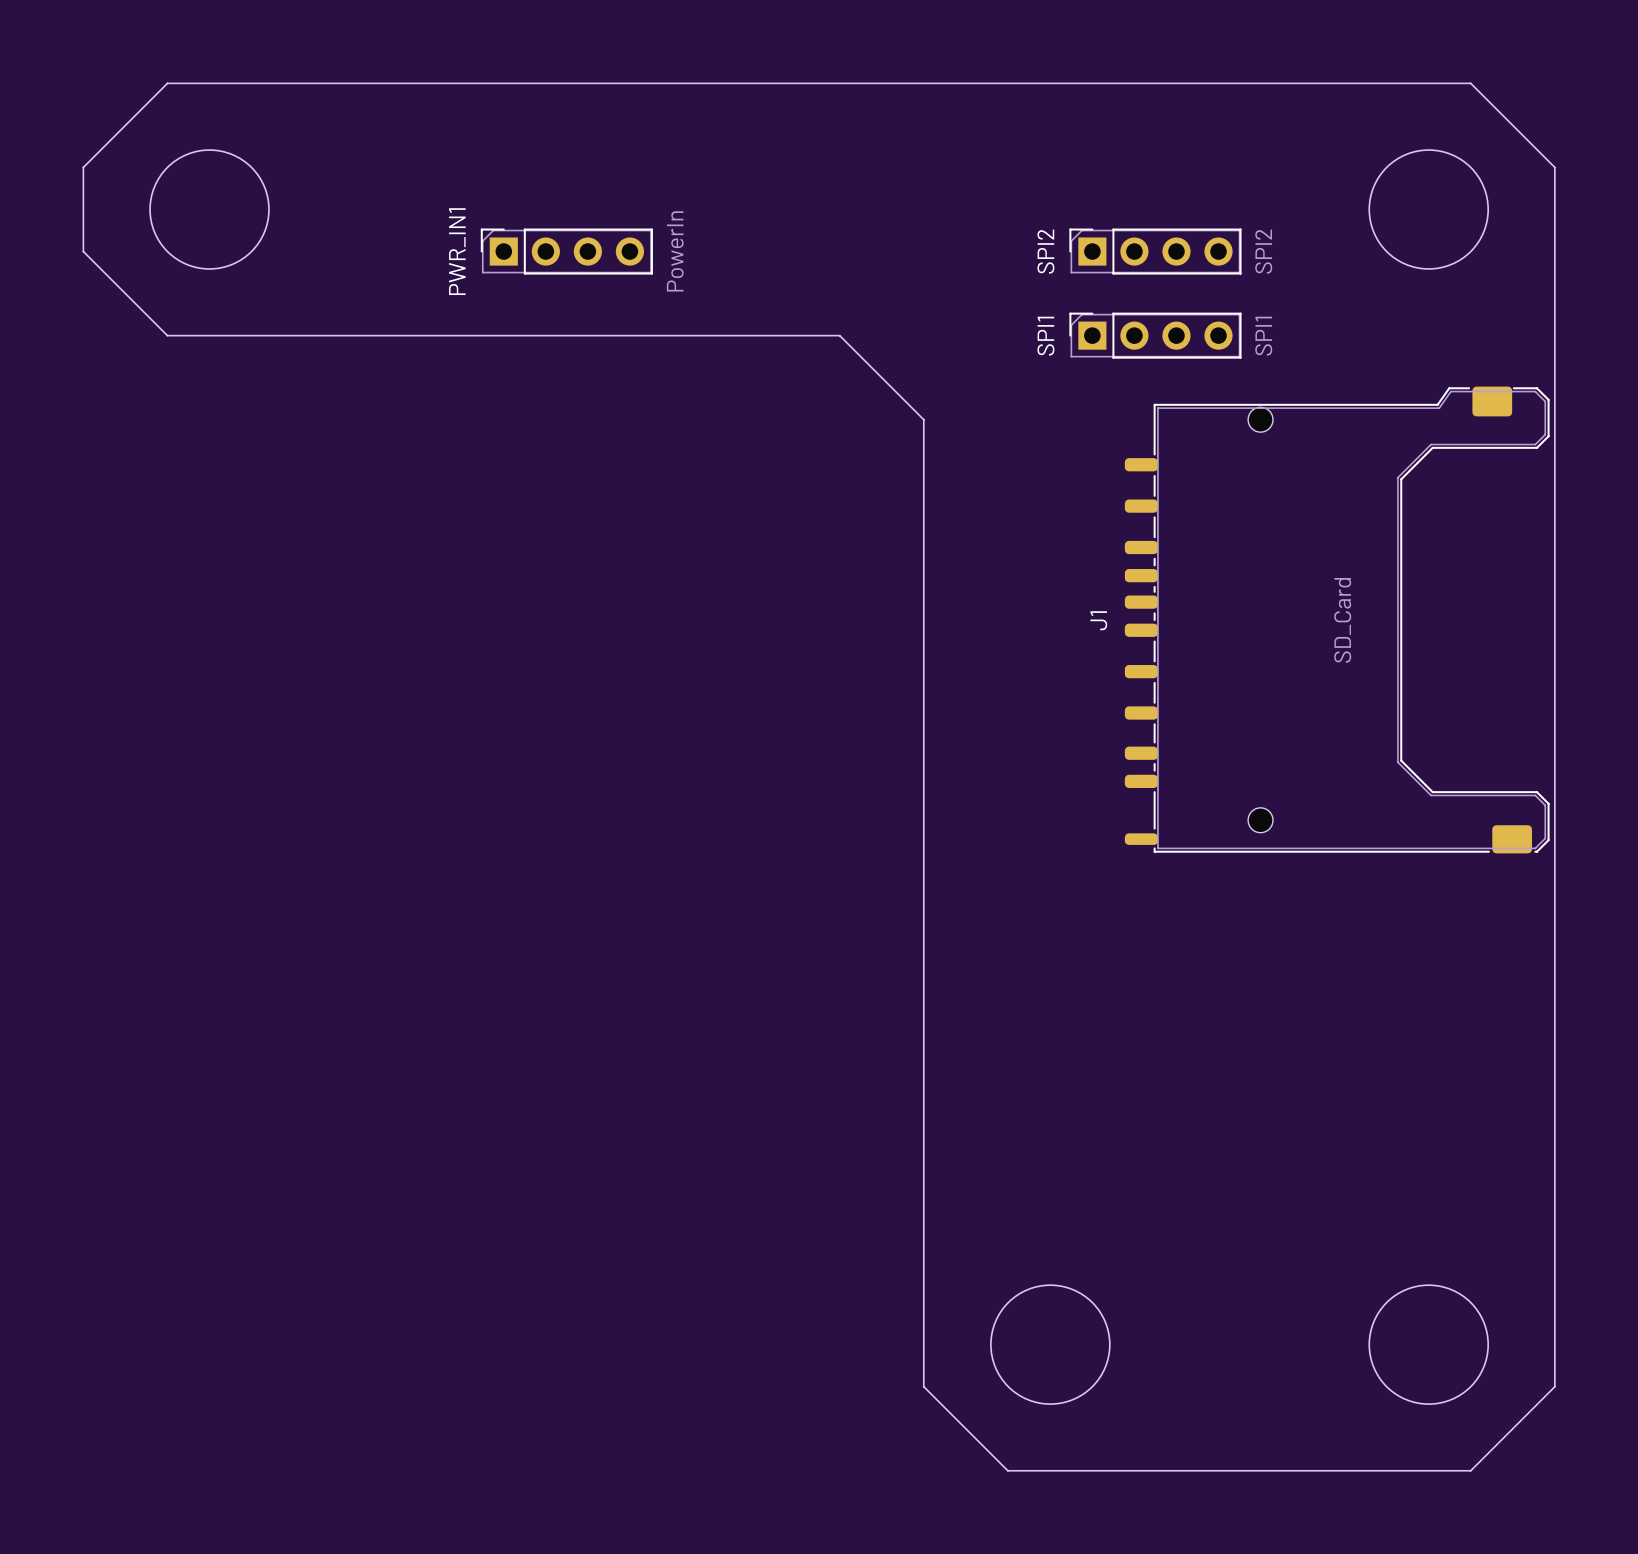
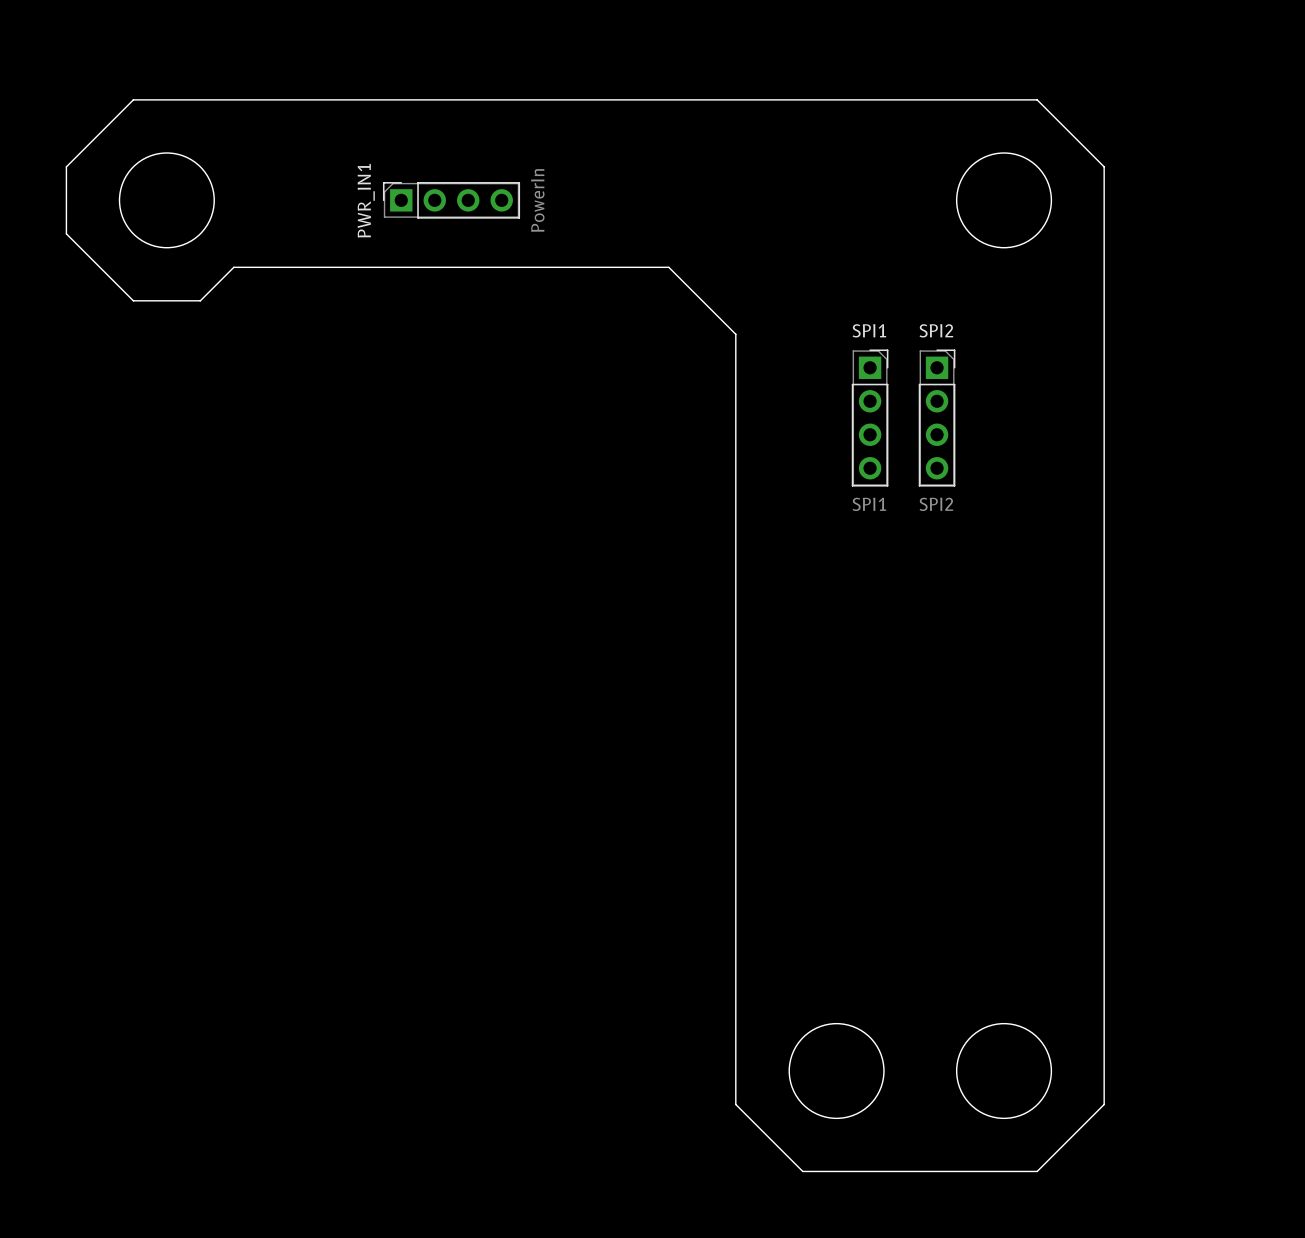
board edge: (83, 209) (83, 167) (167, 83) (1470, 83) (1554, 167) (1554, 1386) (1470, 1470) (1302, 1470) -> (66, 166) (133, 99) (1037, 99) (1104, 166) (1104, 1104) (1037, 1171)
round board edge position: (209, 209) -> (166, 200)
round board edge position: (1428, 209) -> (1004, 200)
board edge: (83, 251) (167, 335) (293, 335) -> (66, 200) (66, 233) (133, 300) (200, 300) (233, 267)
SPI2 rotation: 0° (1155, 251) -> 90° clockwise (937, 418)
SPI2 position: (1155, 251) -> (937, 418)
SPI1 rotation: 0° (1155, 335) -> 90° clockwise (870, 418)
SPI1 position: (1155, 335) -> (870, 418)
J1: SD_Card (1337, 619) -> none
round board edge position: (1428, 1344) -> (1004, 1071)

